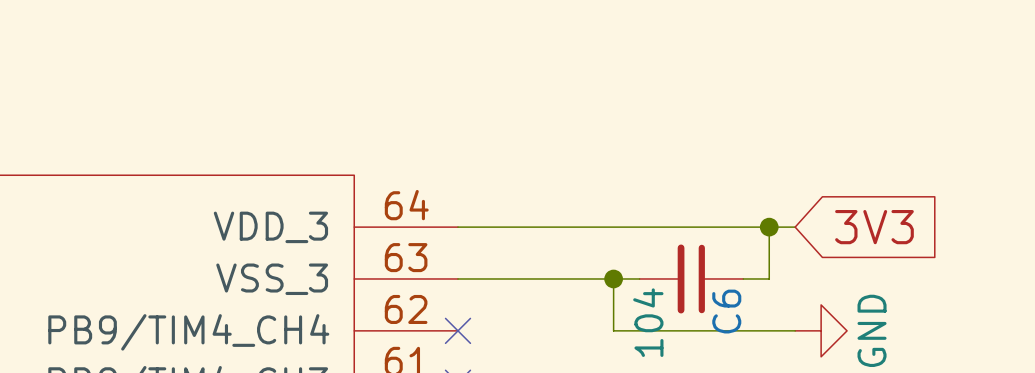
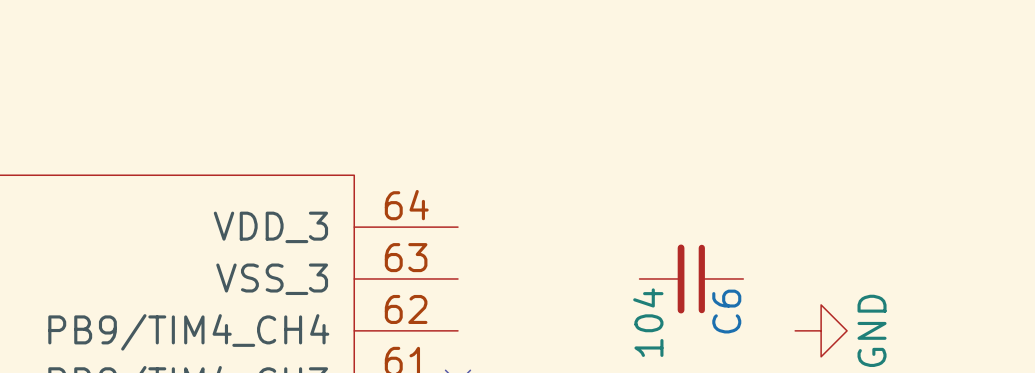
wire: (457, 227) (795, 227) -> none
wire: (769, 227) (769, 278) (743, 278) -> none
junction: (769, 227) -> none
global label: 3V3 (874, 227) -> none
wire: (457, 278) (639, 278) -> none
wire: (613, 278) (613, 330) (795, 330) -> none
junction: (613, 278) -> none
no-connect mark: (457, 330) -> none

